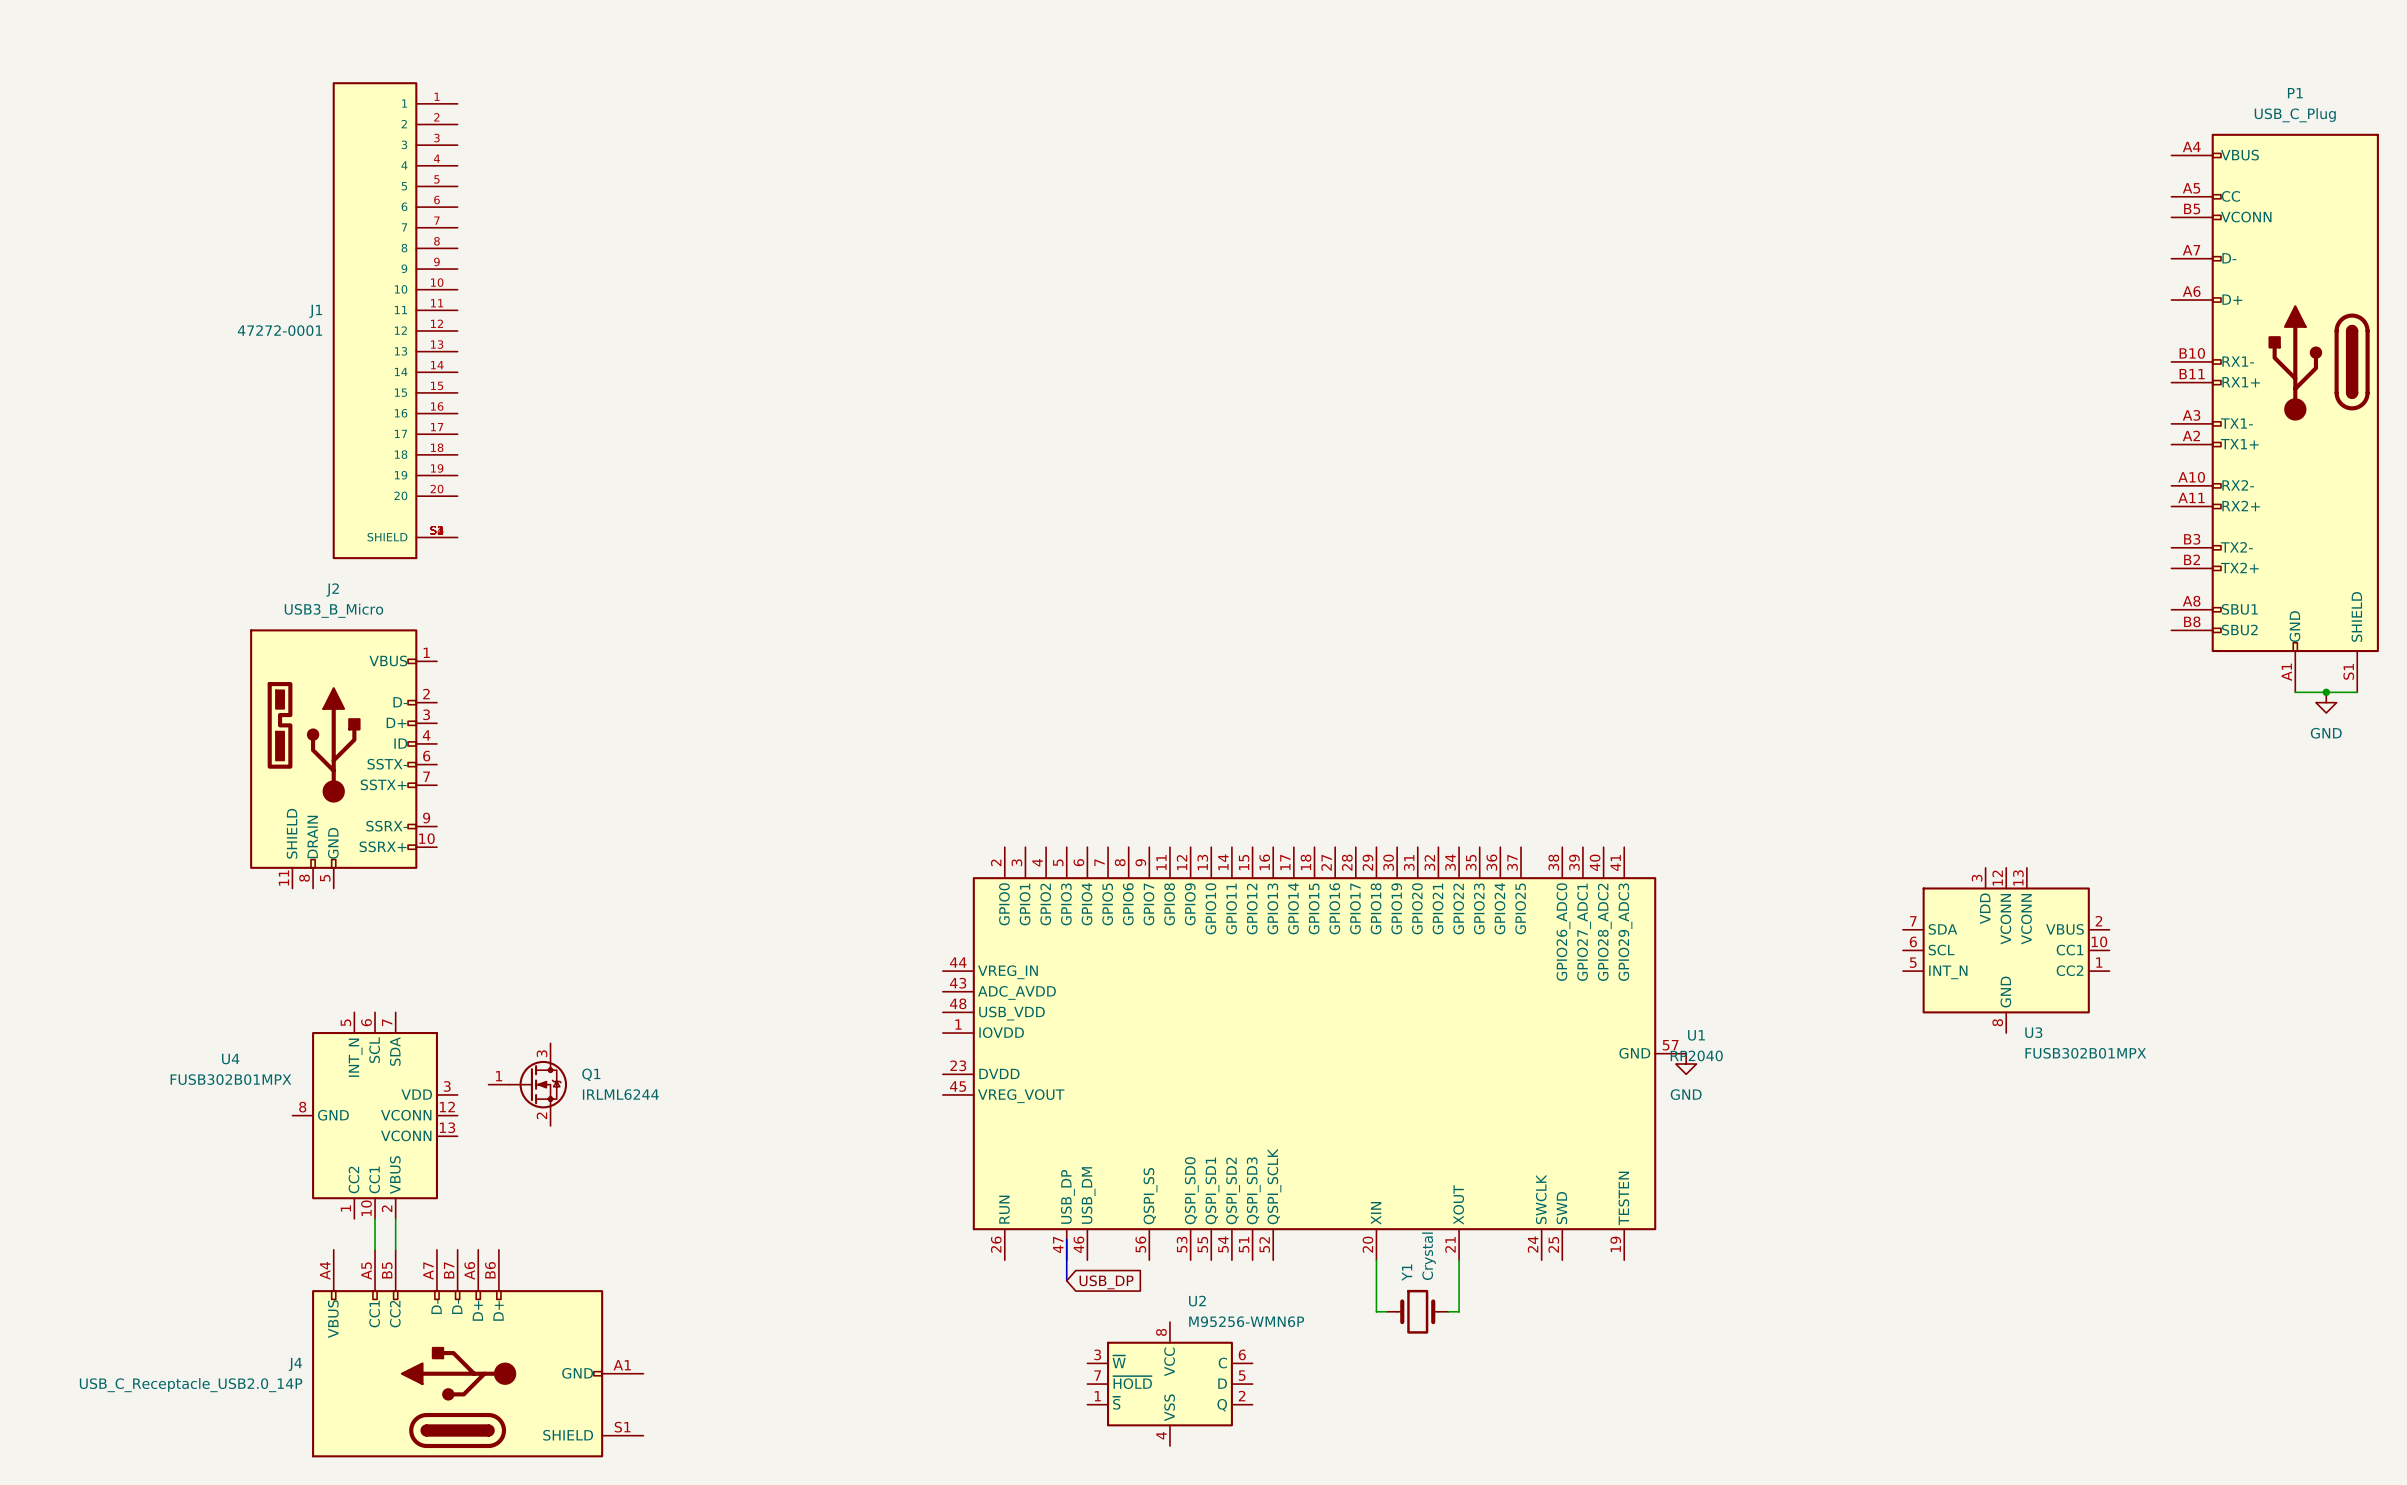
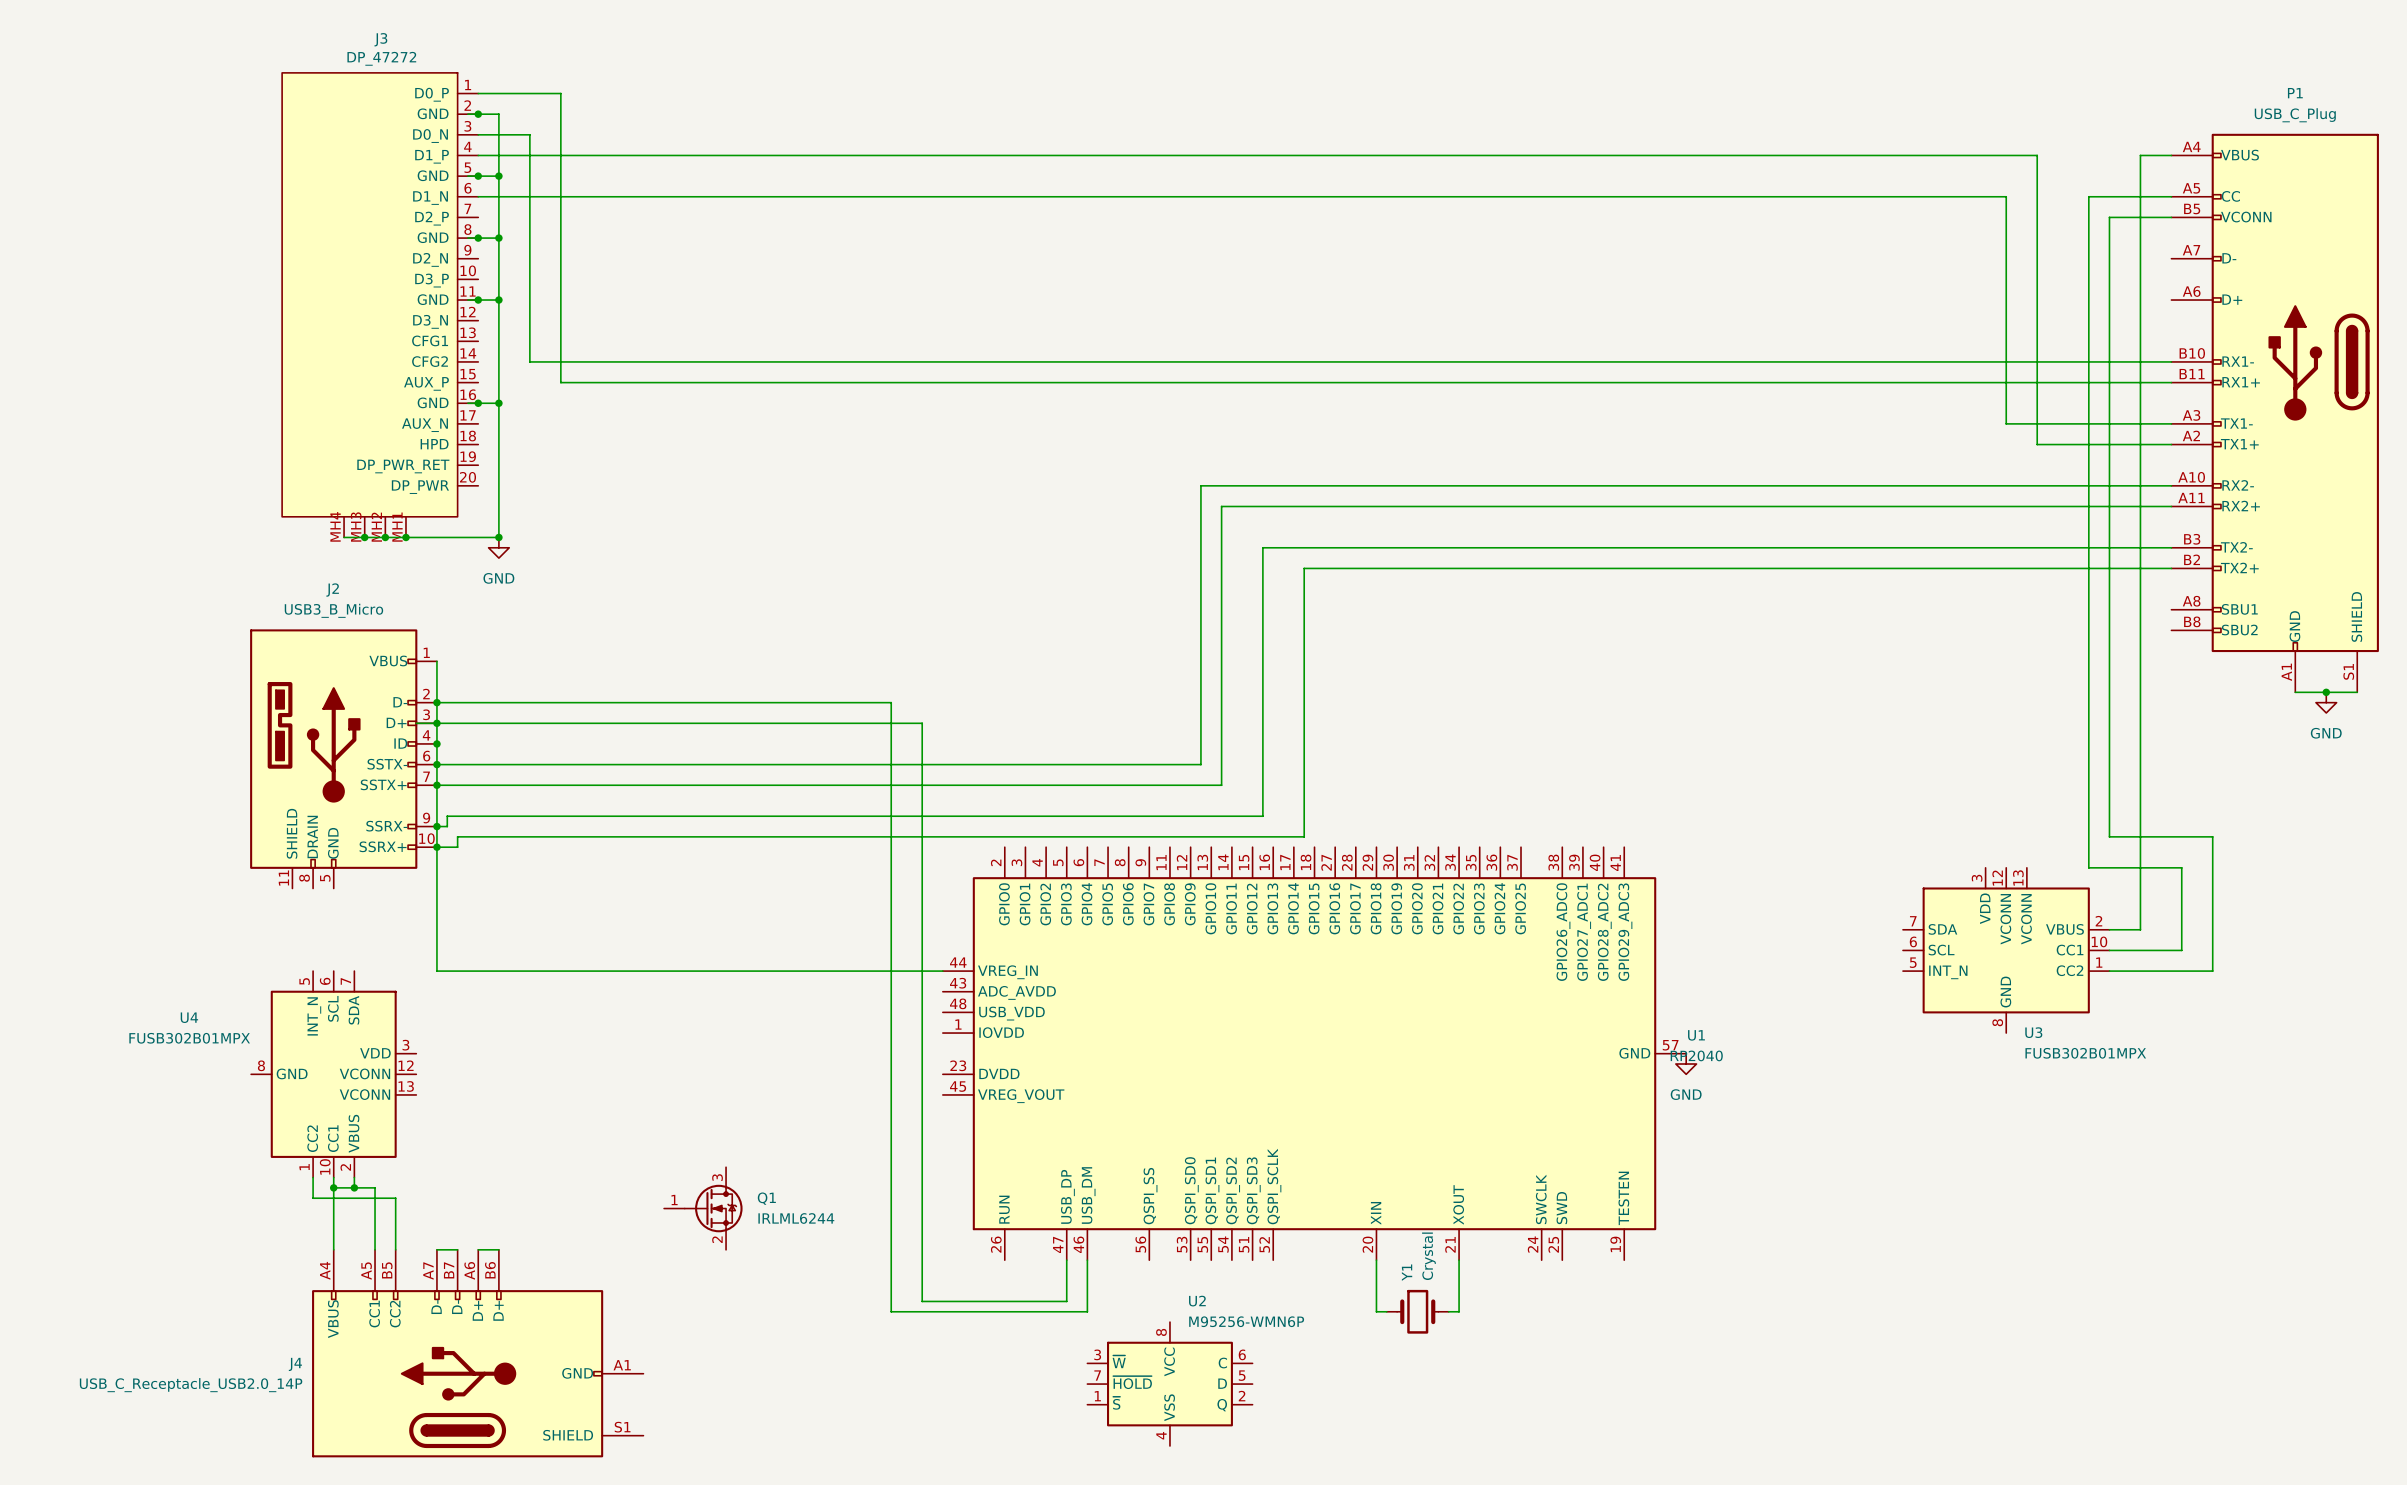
wire: none -> (478, 93) (560, 93) (560, 382) (2171, 382)
wire: none -> (467, 114) (498, 114) (498, 537) (344, 537)
junction: none -> (478, 114)
wire: none -> (478, 134) (529, 134) (529, 361) (2171, 361)
wire: none -> (478, 155) (2037, 155) (2037, 444) (2171, 444)
wire: none -> (2171, 155) (2140, 155) (2140, 929) (2109, 929)
wire: none -> (467, 176) (498, 176)
junction: none -> (478, 176)
junction: none -> (498, 176)
wire: none -> (478, 196) (2006, 196) (2006, 423) (2171, 423)
wire: none -> (2171, 196) (2088, 196) (2088, 867) (2181, 867) (2181, 950) (2109, 950)
wire: none -> (2171, 217) (2109, 217) (2109, 836) (2212, 836) (2212, 971) (2109, 971)
wire: none -> (467, 238) (498, 238)
junction: none -> (478, 238)
junction: none -> (498, 238)
wire: none -> (467, 300) (498, 300)
junction: none -> (478, 300)
junction: none -> (498, 300)
J3: none -> DP_47272 (380, 305)
J1: 47272-0001 (395, 320) -> none
wire: none -> (467, 403) (498, 403)
junction: none -> (478, 403)
junction: none -> (498, 403)
wire: none -> (2171, 485) (1200, 485) (1200, 764) (436, 764)
wire: none -> (2171, 506) (1221, 506) (1221, 785) (436, 785)
junction: none -> (364, 537)
junction: none -> (385, 537)
junction: none -> (405, 537)
junction: none -> (498, 537)
power symbol: none -> GND (498, 547)
wire: none -> (2171, 547) (1262, 547) (1262, 816) (447, 816) (447, 826) (436, 826)
wire: none -> (2171, 568) (1304, 568) (1304, 836) (457, 836) (457, 847) (436, 847)
wire: none -> (436, 661) (436, 971) (942, 971)
wire: none -> (436, 702) (891, 702) (891, 1311) (1087, 1311) (1087, 1260)
junction: none -> (436, 702)
wire: none -> (416, 723) (922, 723) (922, 1301) (1066, 1301) (1066, 1260)
junction: none -> (436, 723)
junction: none -> (436, 743)
junction: none -> (436, 764)
junction: none -> (436, 785)
junction: none -> (436, 826)
junction: none -> (436, 847)
Q1 position: (527, 1084) -> (703, 1208)
U4 position: (375, 1115) -> (333, 1074)
wire: none -> (333, 1177) (333, 1249)
junction: none -> (333, 1187)
junction: none -> (354, 1187)
bus: (1066, 1239) (1066, 1280) -> none
wire: none -> (436, 1249) (457, 1249)
wire: none -> (478, 1249) (498, 1249)
global label: USB_DP (1106, 1282) -> none

